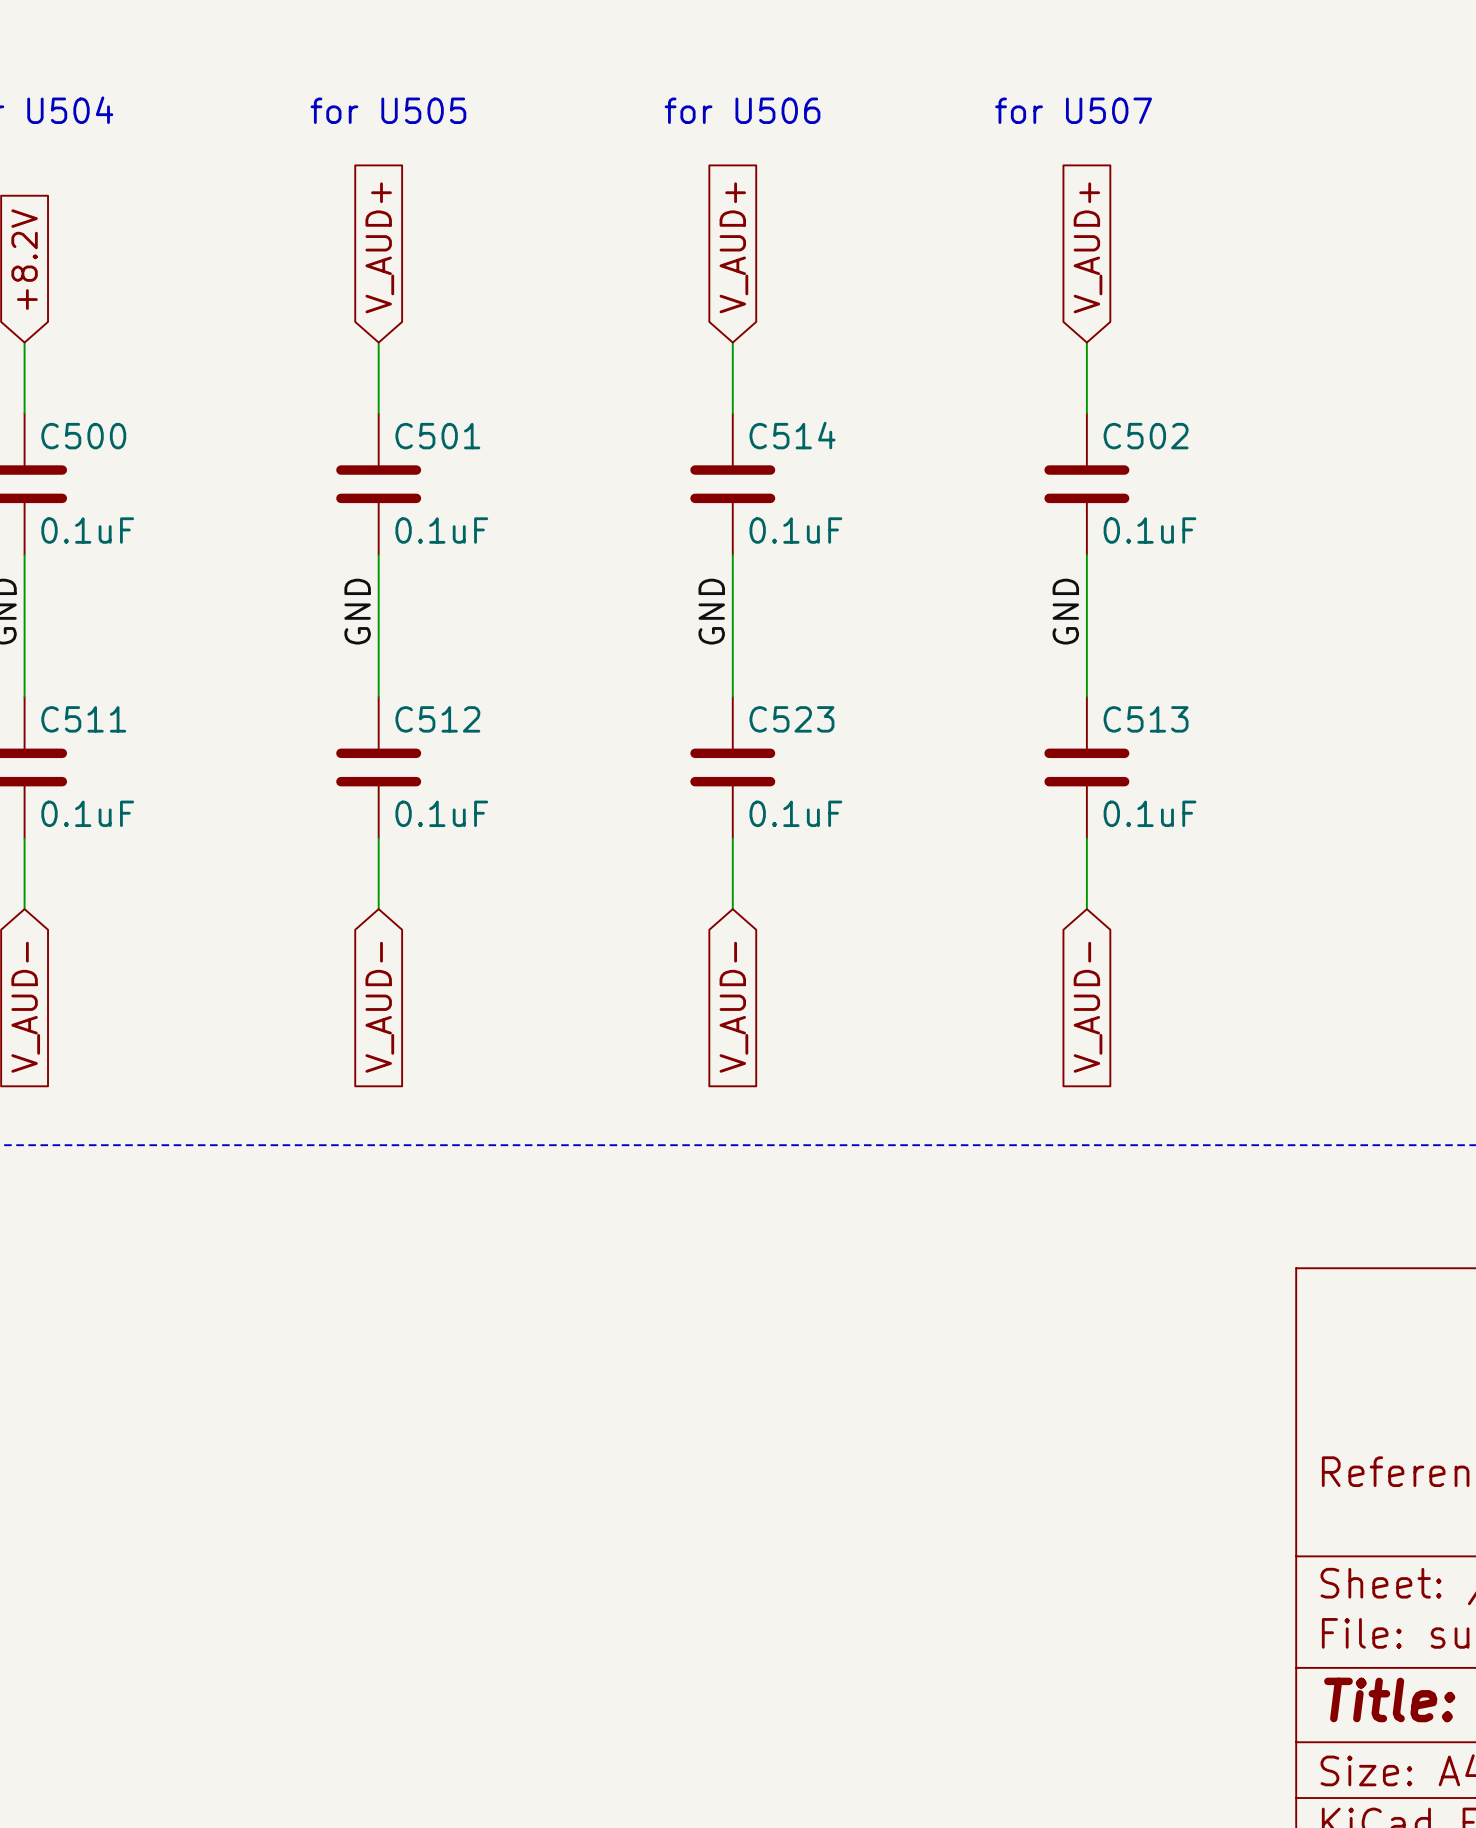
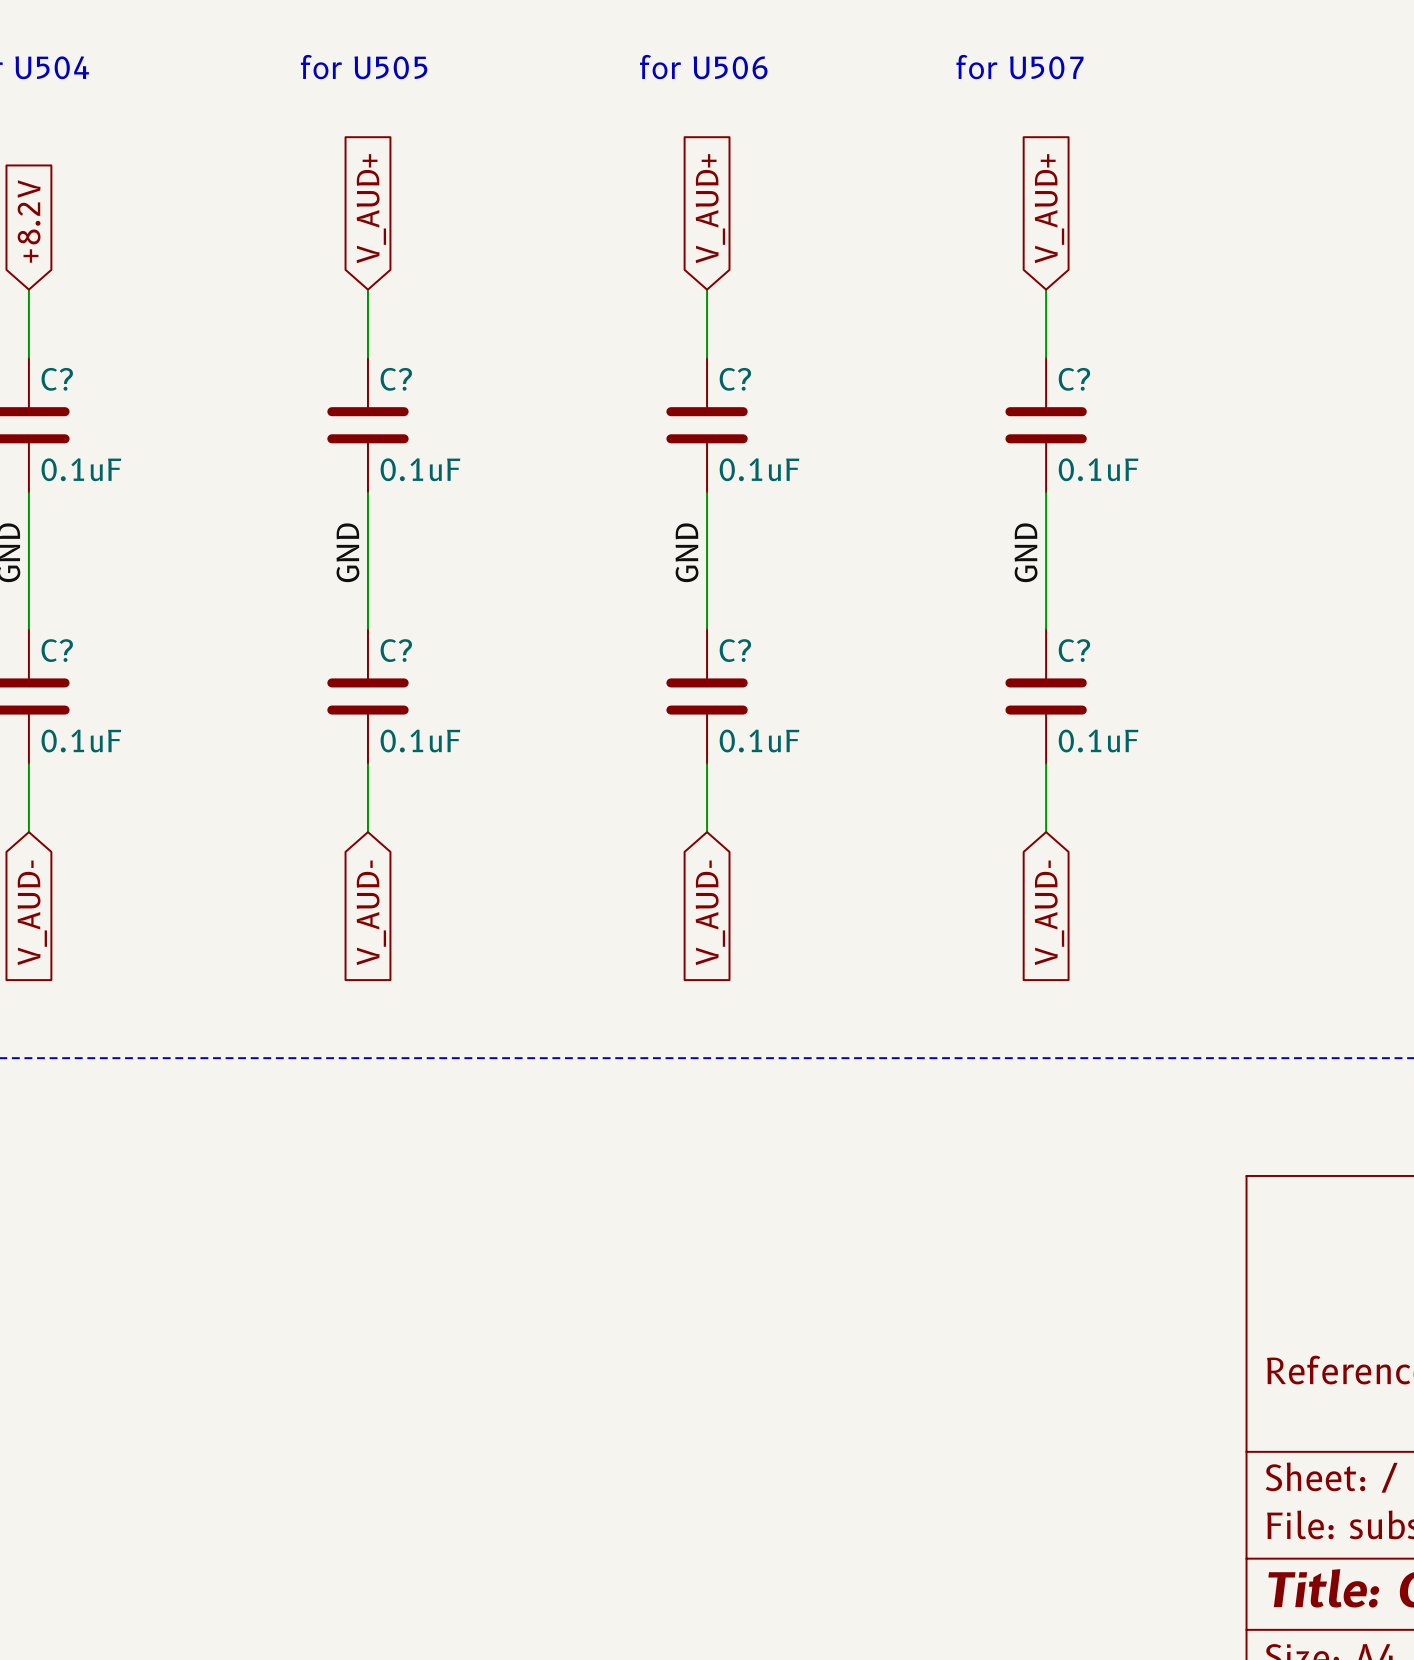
C514 name: C514 (792, 435) -> C? (735, 379)
C500 name: C500 (83, 436) -> C? (57, 379)
C501 name: C501 (437, 436) -> C? (396, 379)
C502 name: C502 (1146, 436) -> C? (1074, 379)
C511 name: C511 (83, 719) -> C? (57, 650)
C512 name: C512 (437, 719) -> C? (396, 650)
C523 name: C523 (791, 719) -> C? (735, 650)
C513 name: C513 (1146, 719) -> C? (1074, 650)

